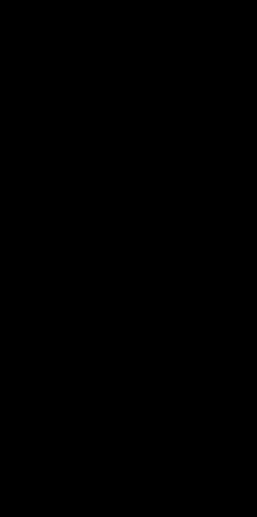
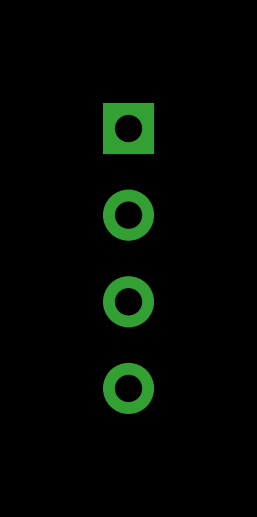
part: none -> (128, 258)

